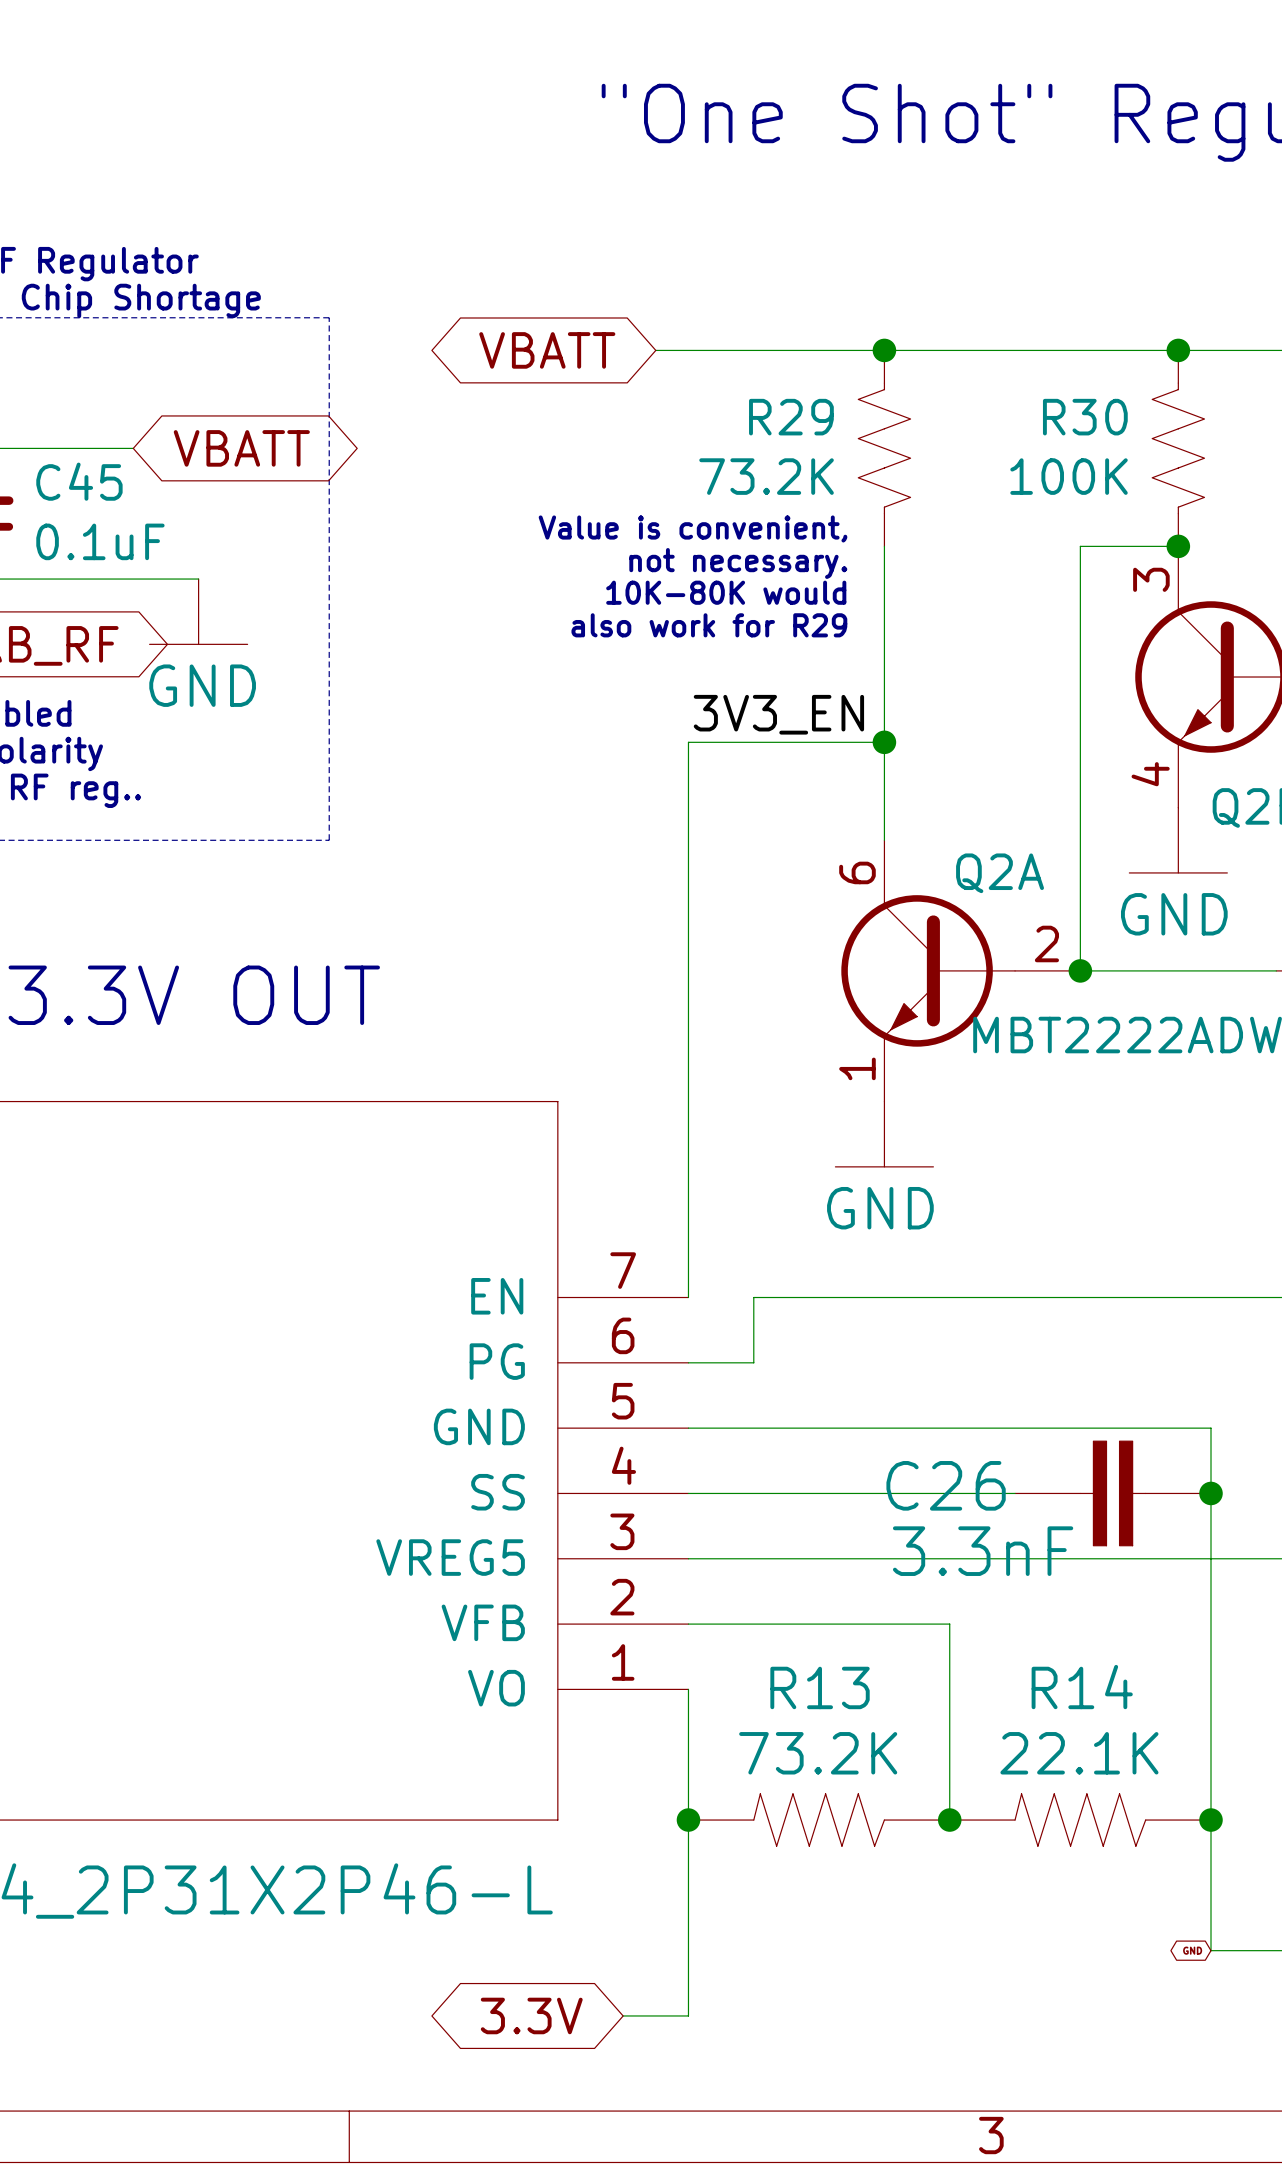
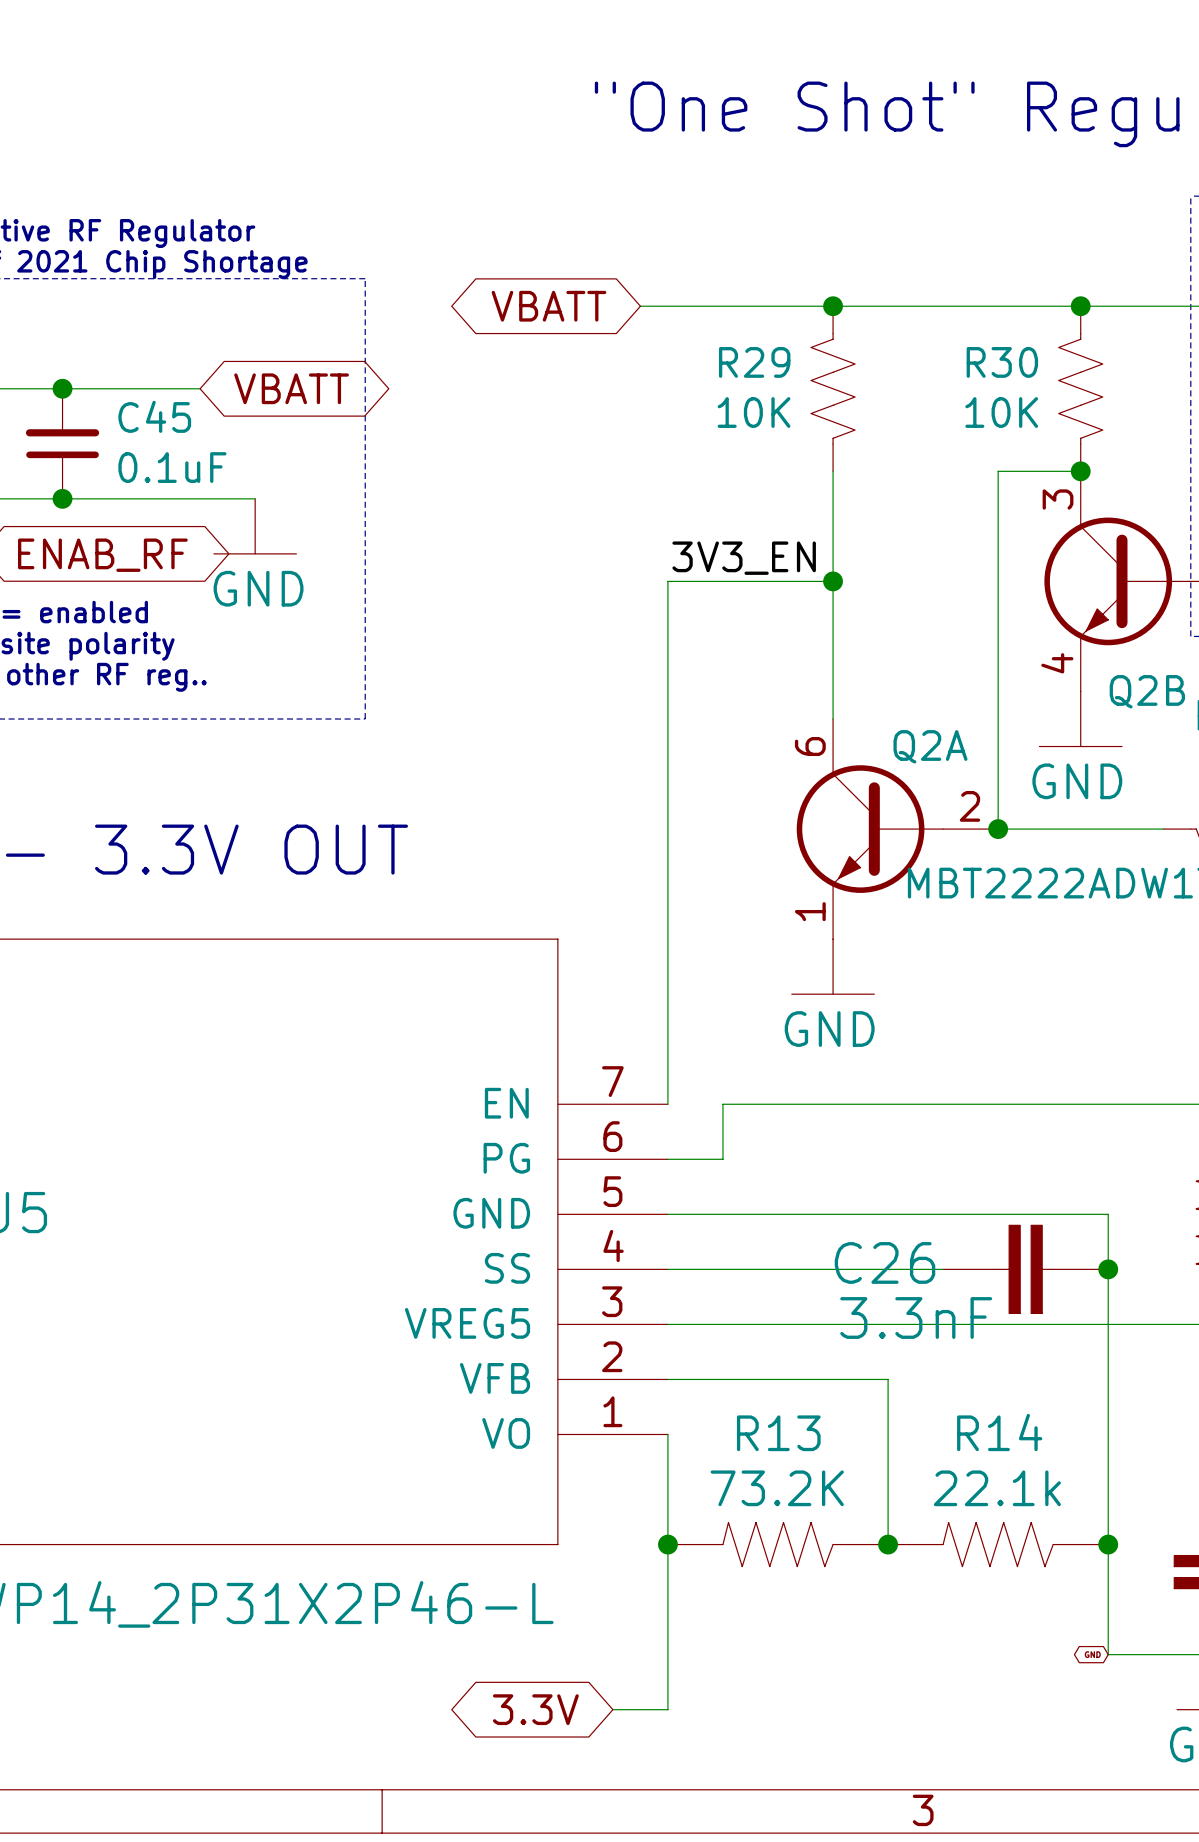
R29 value: 73.2K (766, 476) -> 10K (754, 412)
R30 value: 100K (1069, 476) -> 10K (1001, 412)
text: Value is convenient, (692, 528) -> none
text: not necessary. (738, 563) -> none
text: 10K-80K would (726, 592) -> none
text: also work for R29 (709, 625) -> none
label position: 3V3_EN (778, 714) -> 3V3_EN (744, 558)
wire: (688, 742) (884, 742) -> (667, 636) (667, 581) (833, 581)
junction position: (884, 742) -> (833, 581)
R14 value: 22.1K (1079, 1753) -> 22.1k (997, 1488)

